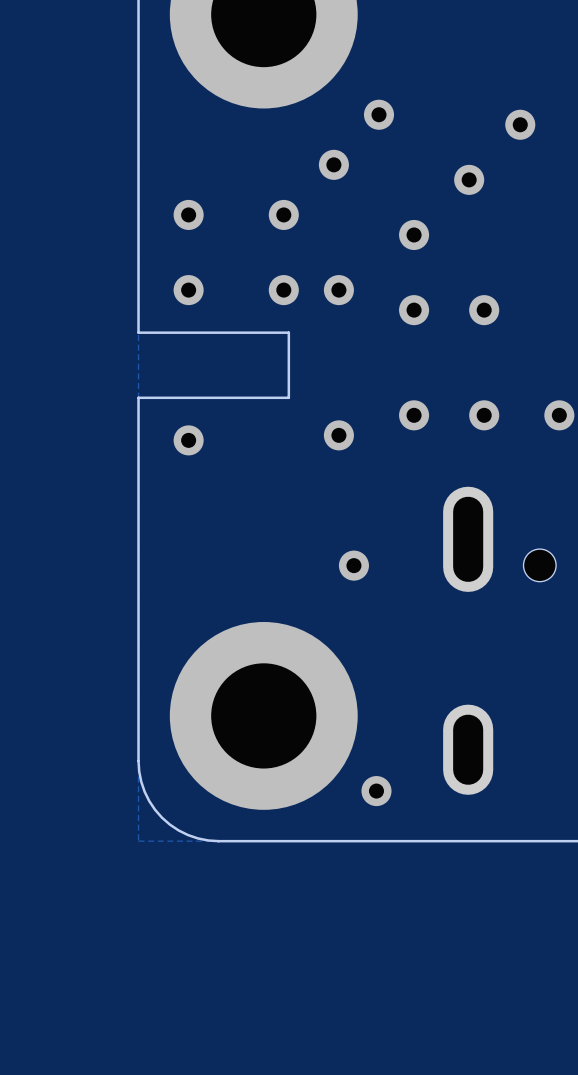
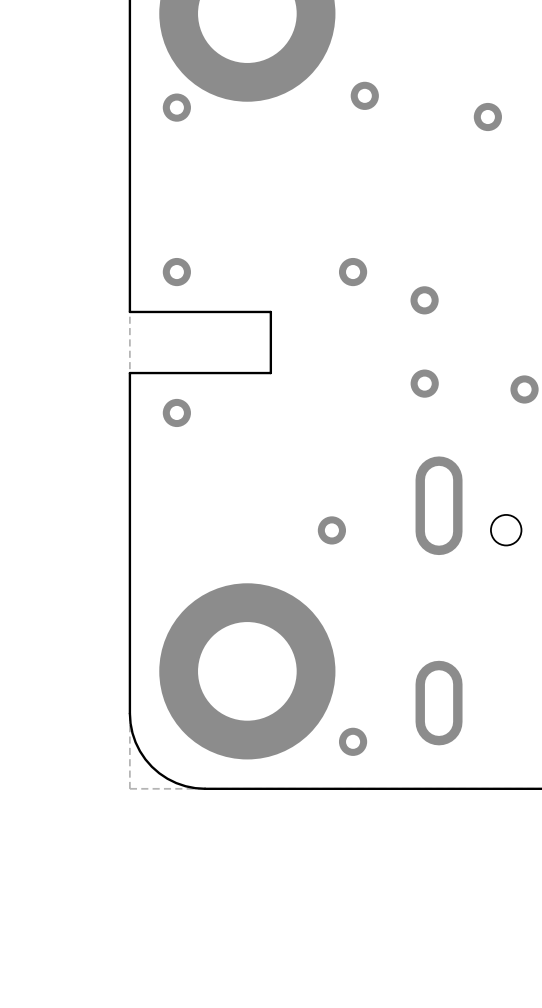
via: none -> (176, 107)
via position: (378, 114) -> (364, 95)
via: (333, 164) -> none
via: (469, 179) -> none
via: (188, 214) -> none
via: (283, 214) -> none
via: (414, 234) -> none
via: (283, 290) -> none
via: (338, 290) -> none
via: none -> (353, 272)
via: (414, 310) -> none
via: (484, 310) -> none
via: none -> (424, 300)
via: none -> (424, 383)
via: (414, 415) -> none
via: (484, 415) -> none
via: (338, 435) -> none

